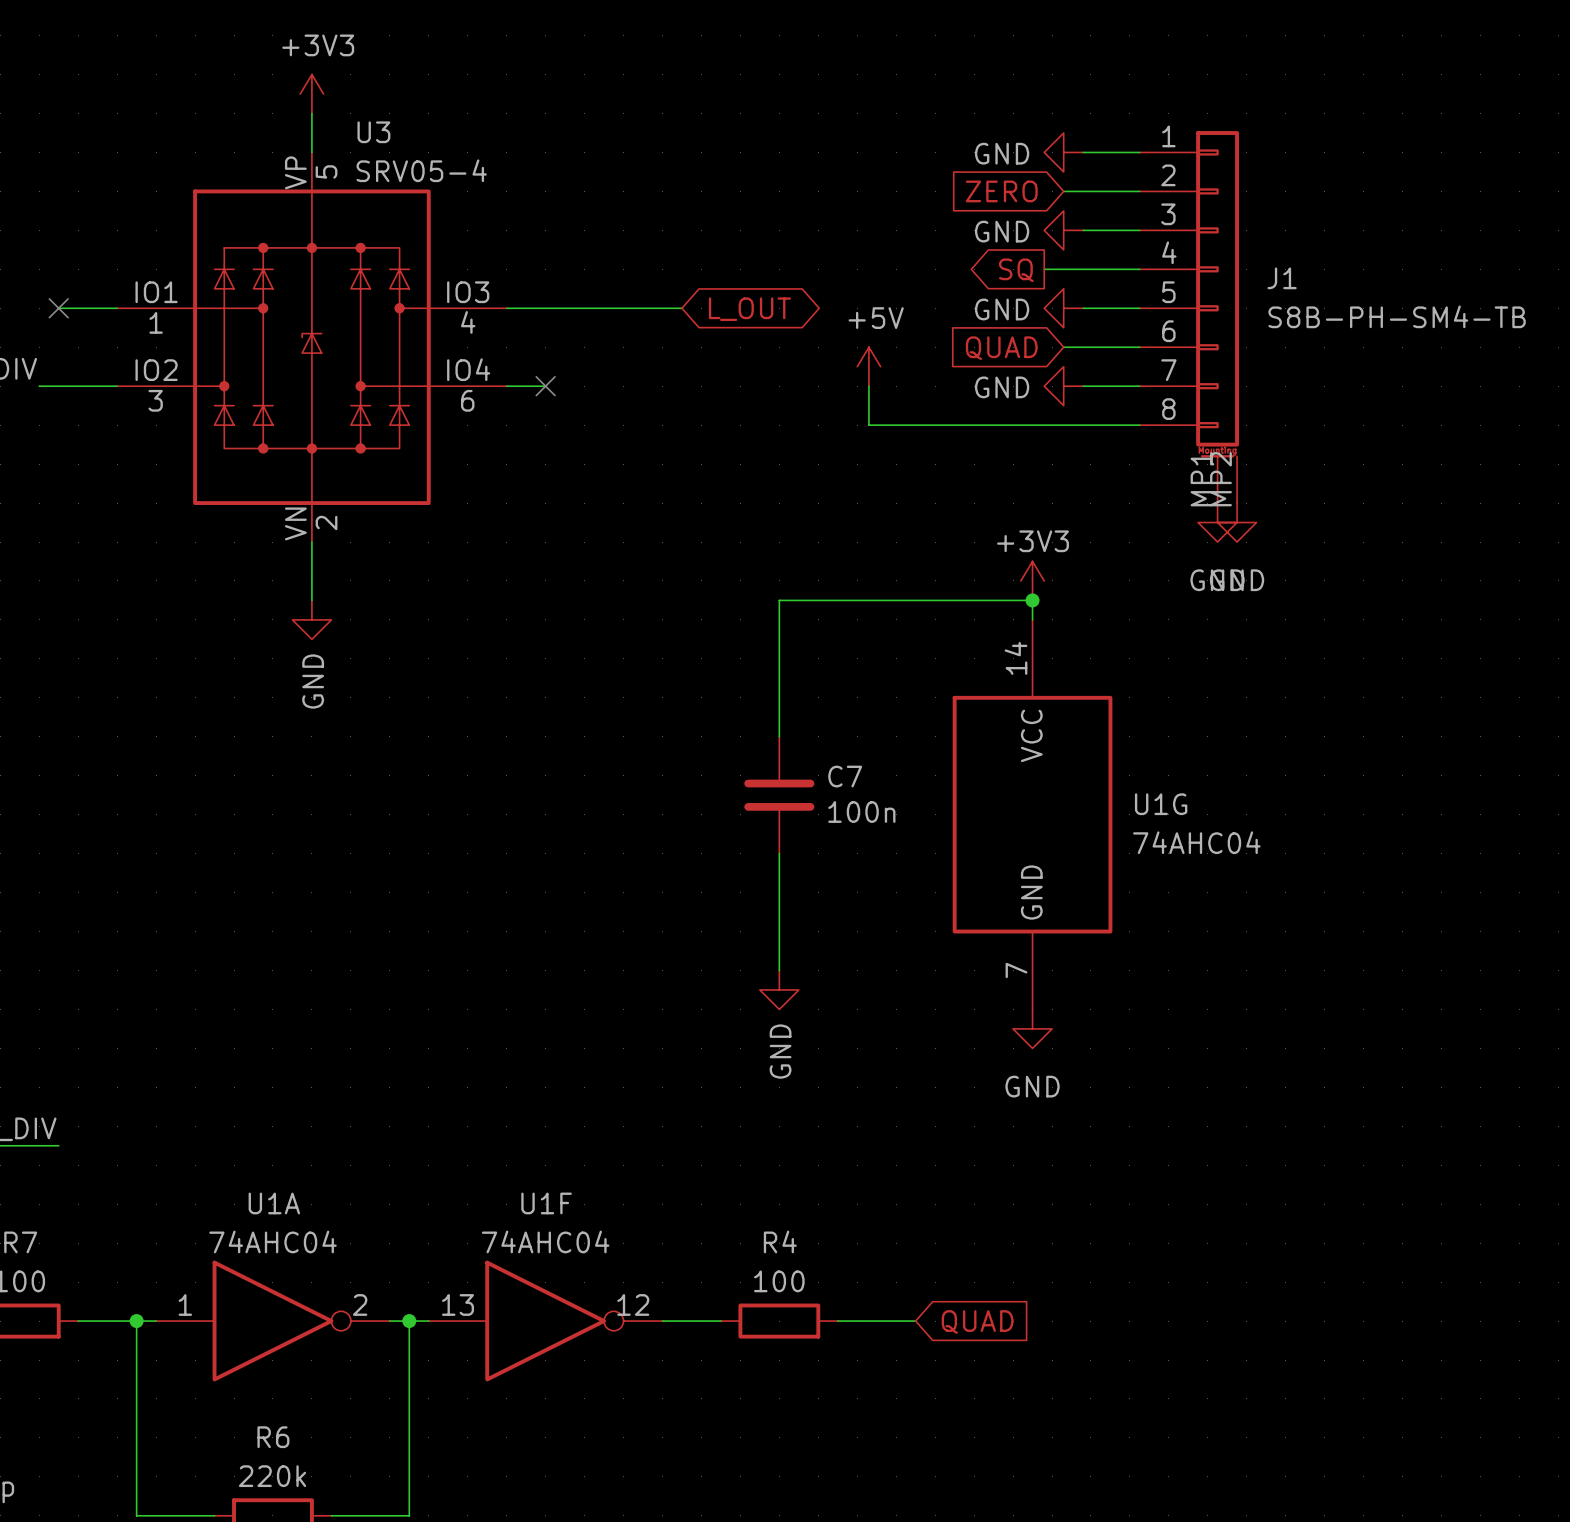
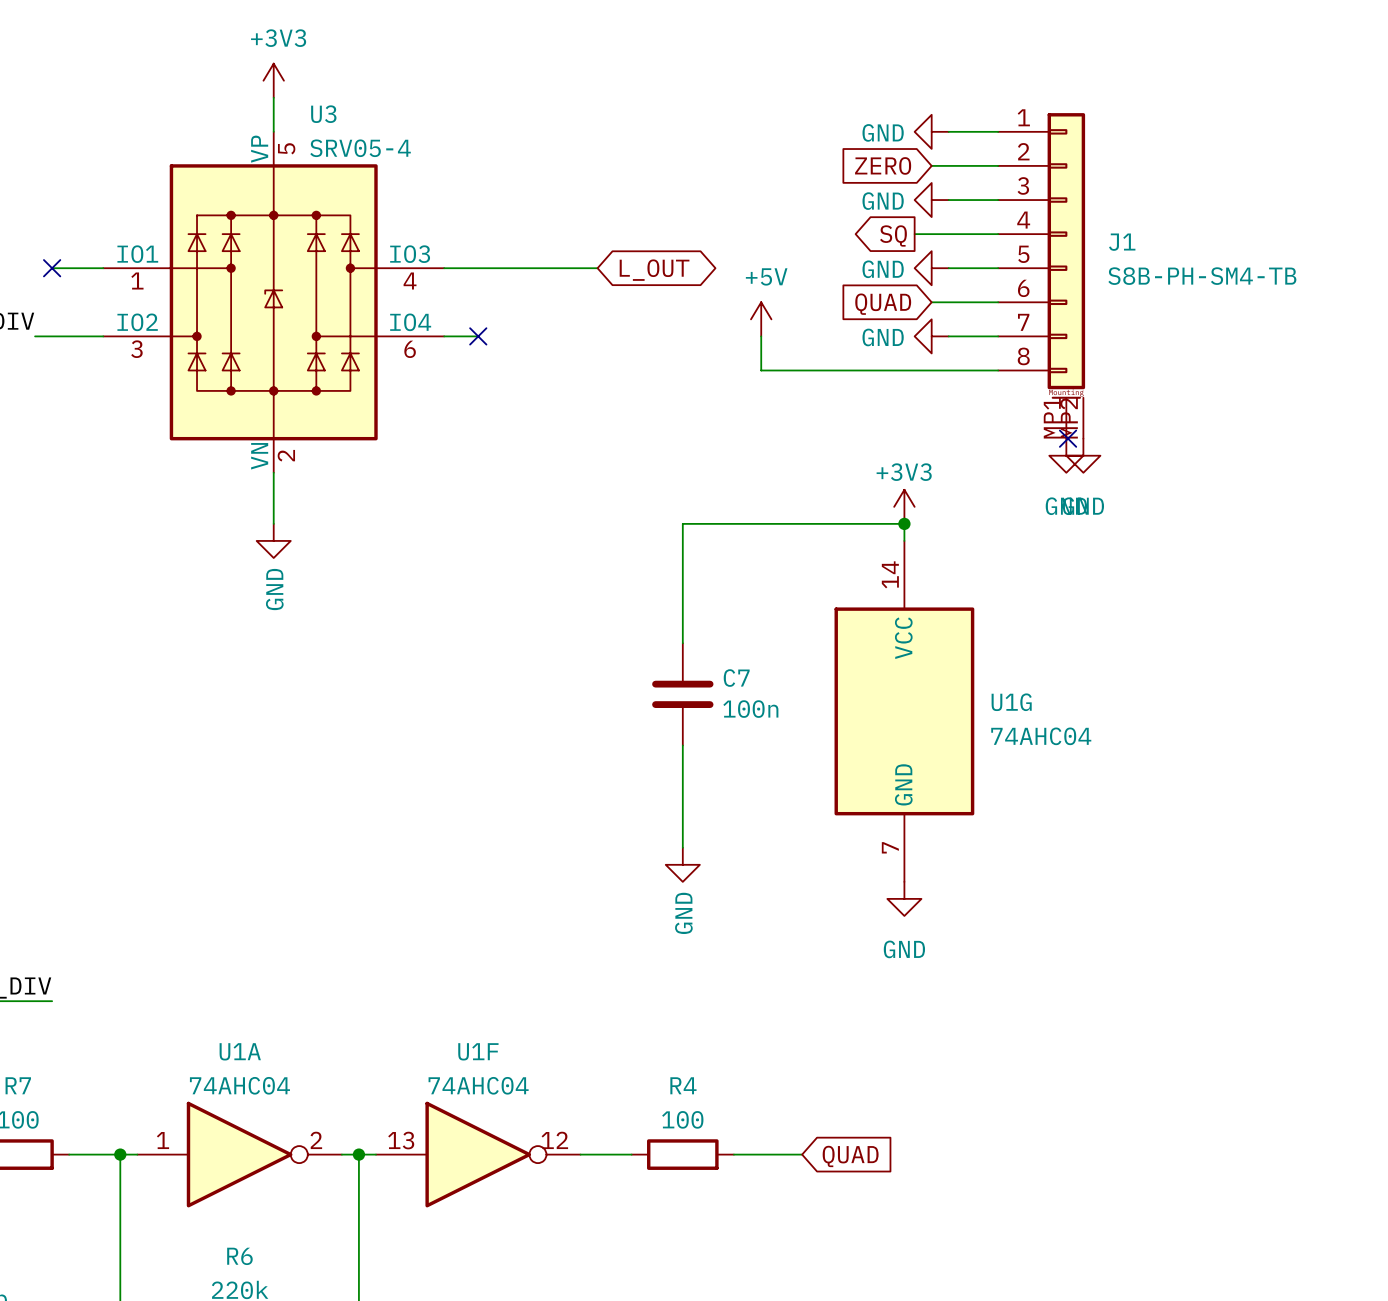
no-connect mark: none -> (1068, 438)

